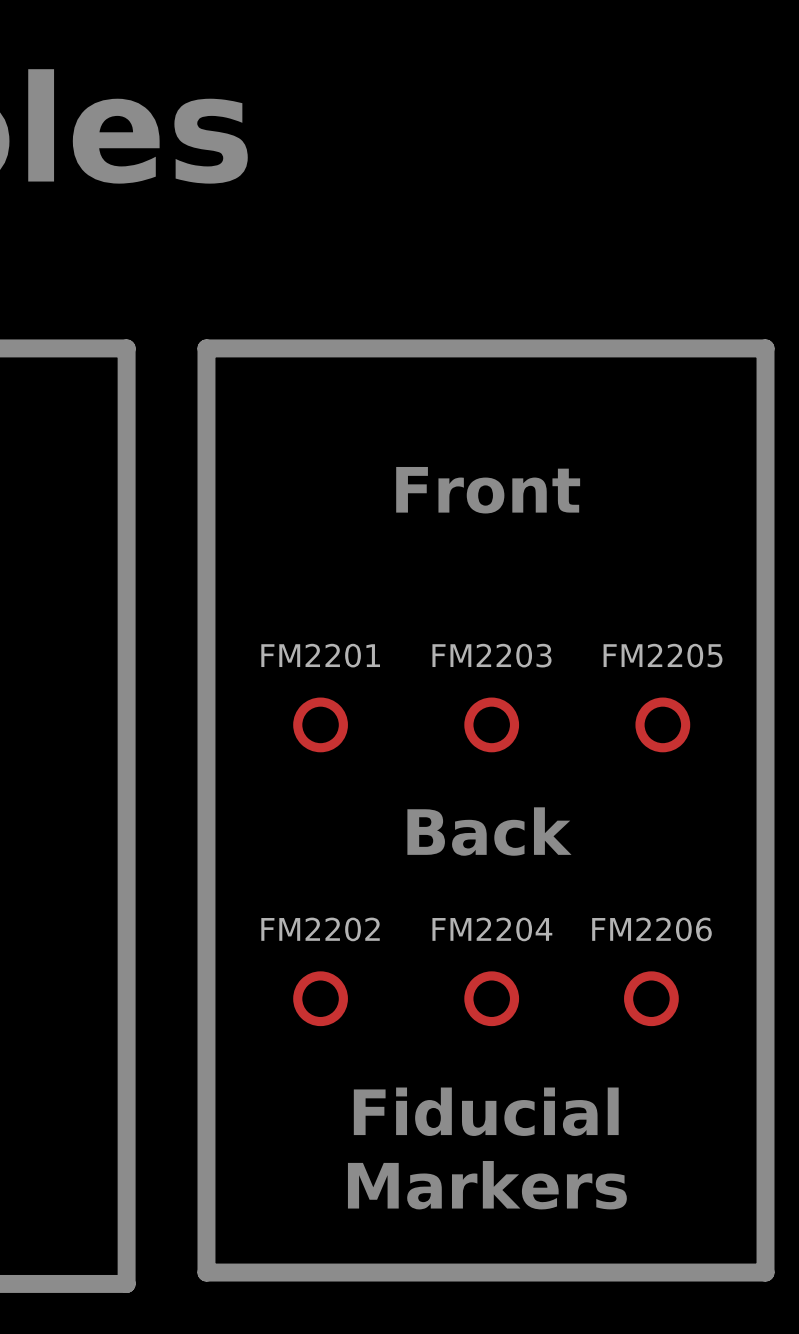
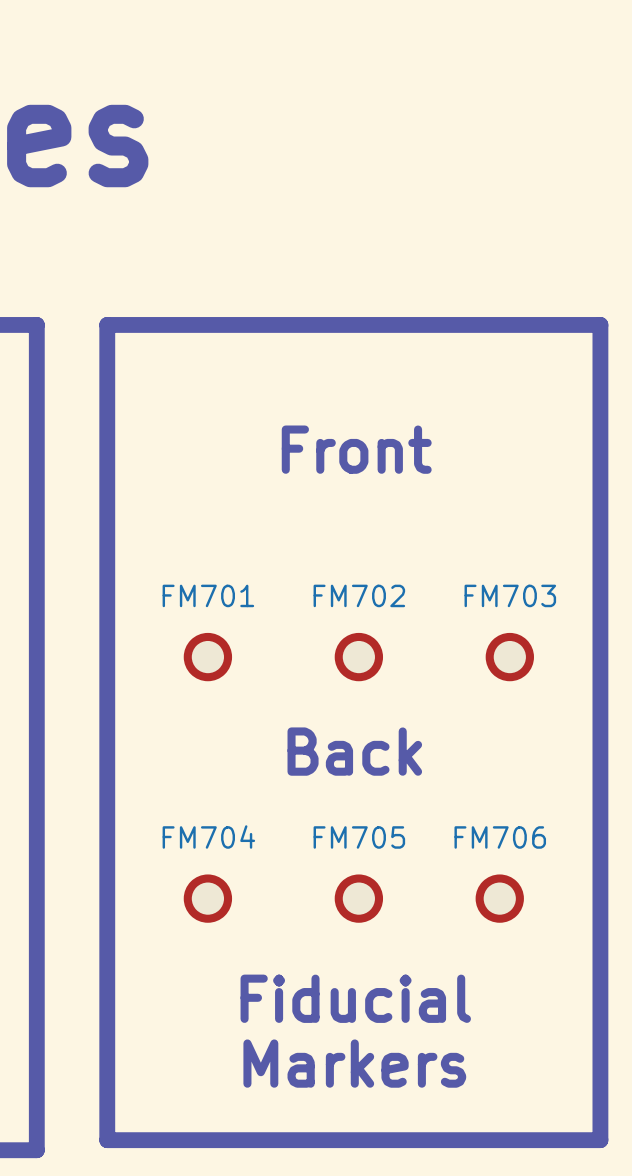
FM2201 name: FM2201 (320, 655) -> FM701 (208, 595)
FM2203 name: FM2203 (491, 655) -> FM702 (359, 595)
FM2205 name: FM2205 (663, 655) -> FM703 (510, 595)
FM2202 name: FM2202 (320, 929) -> FM704 (208, 837)
FM2204 name: FM2204 (492, 929) -> FM705 (359, 837)
FM2206 name: FM2206 (651, 929) -> FM706 (500, 837)

